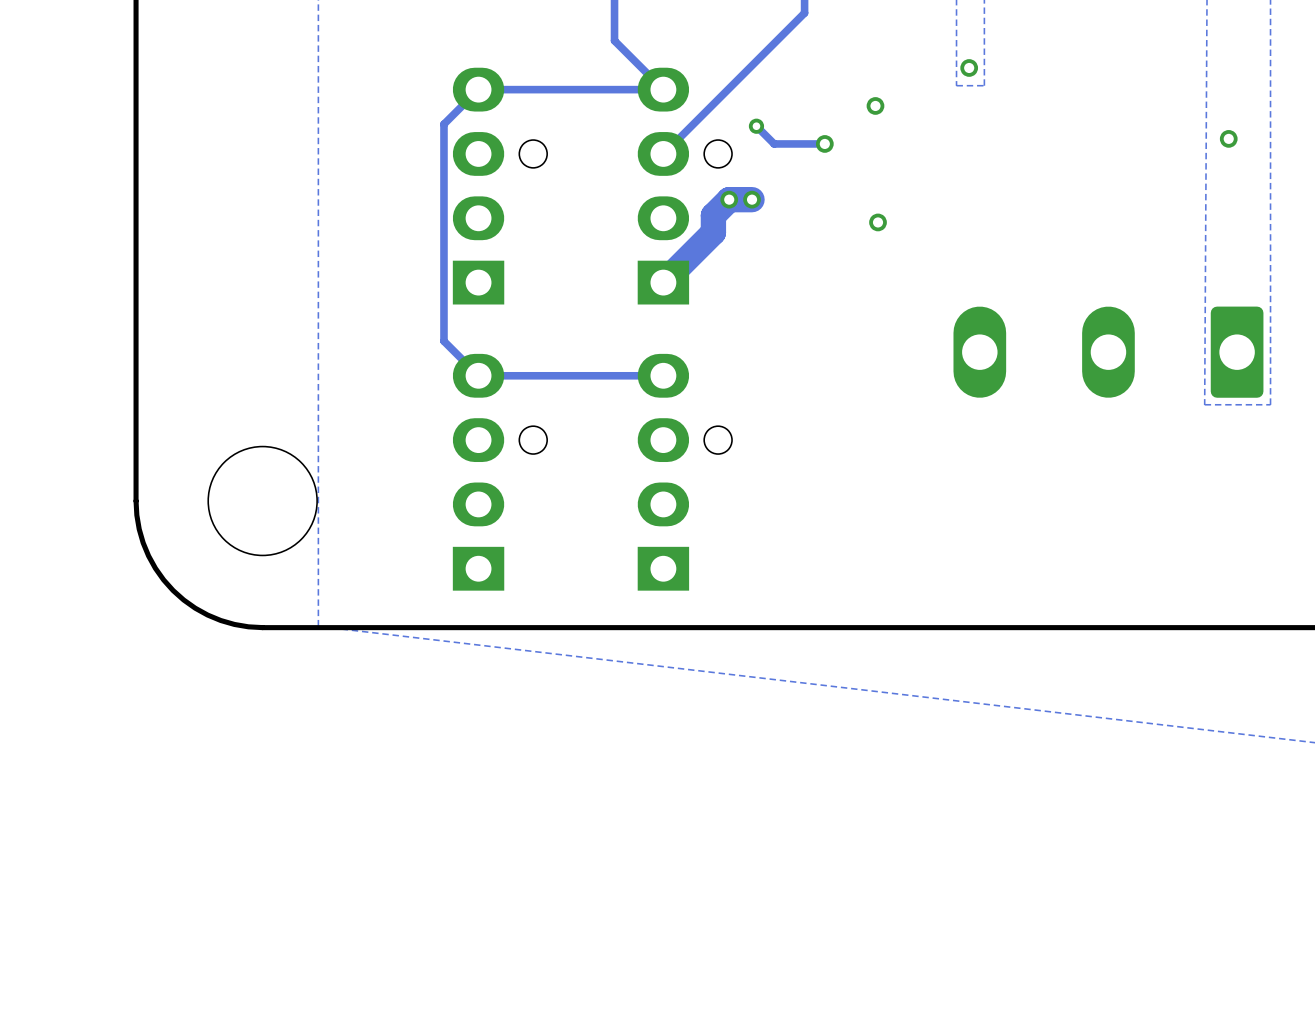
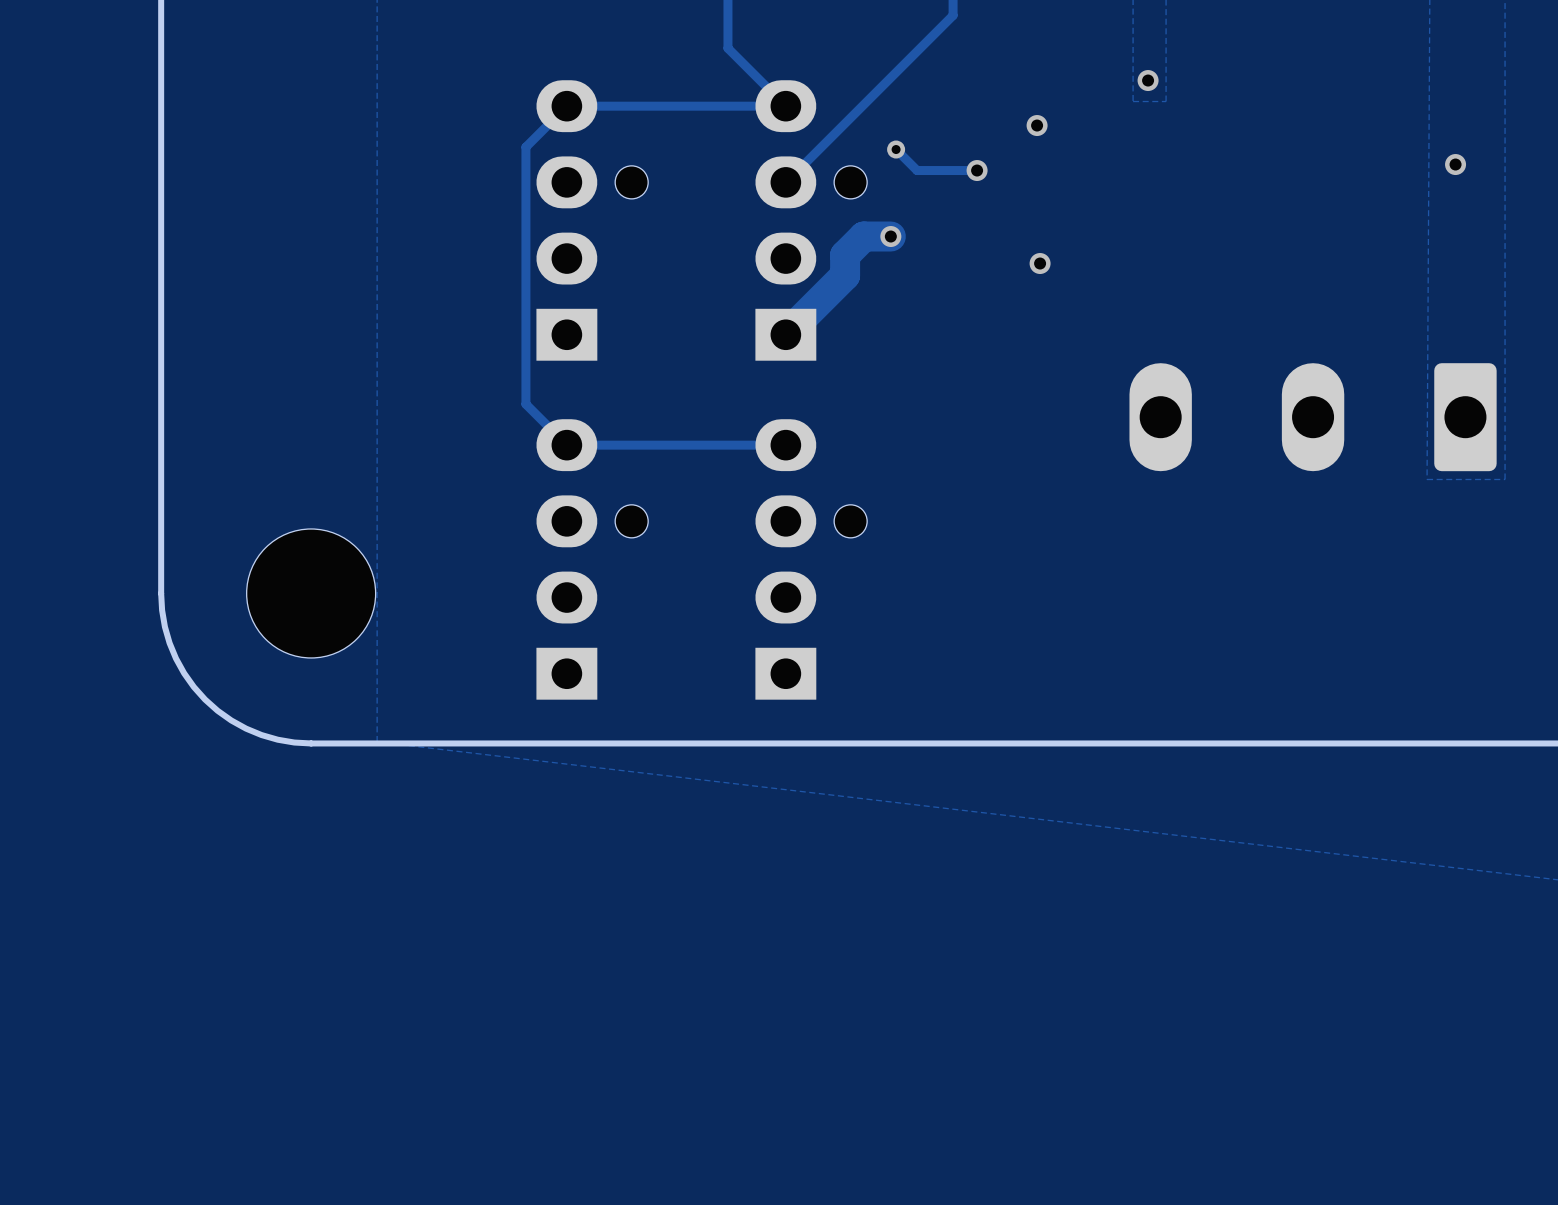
via: (729, 199) -> none

